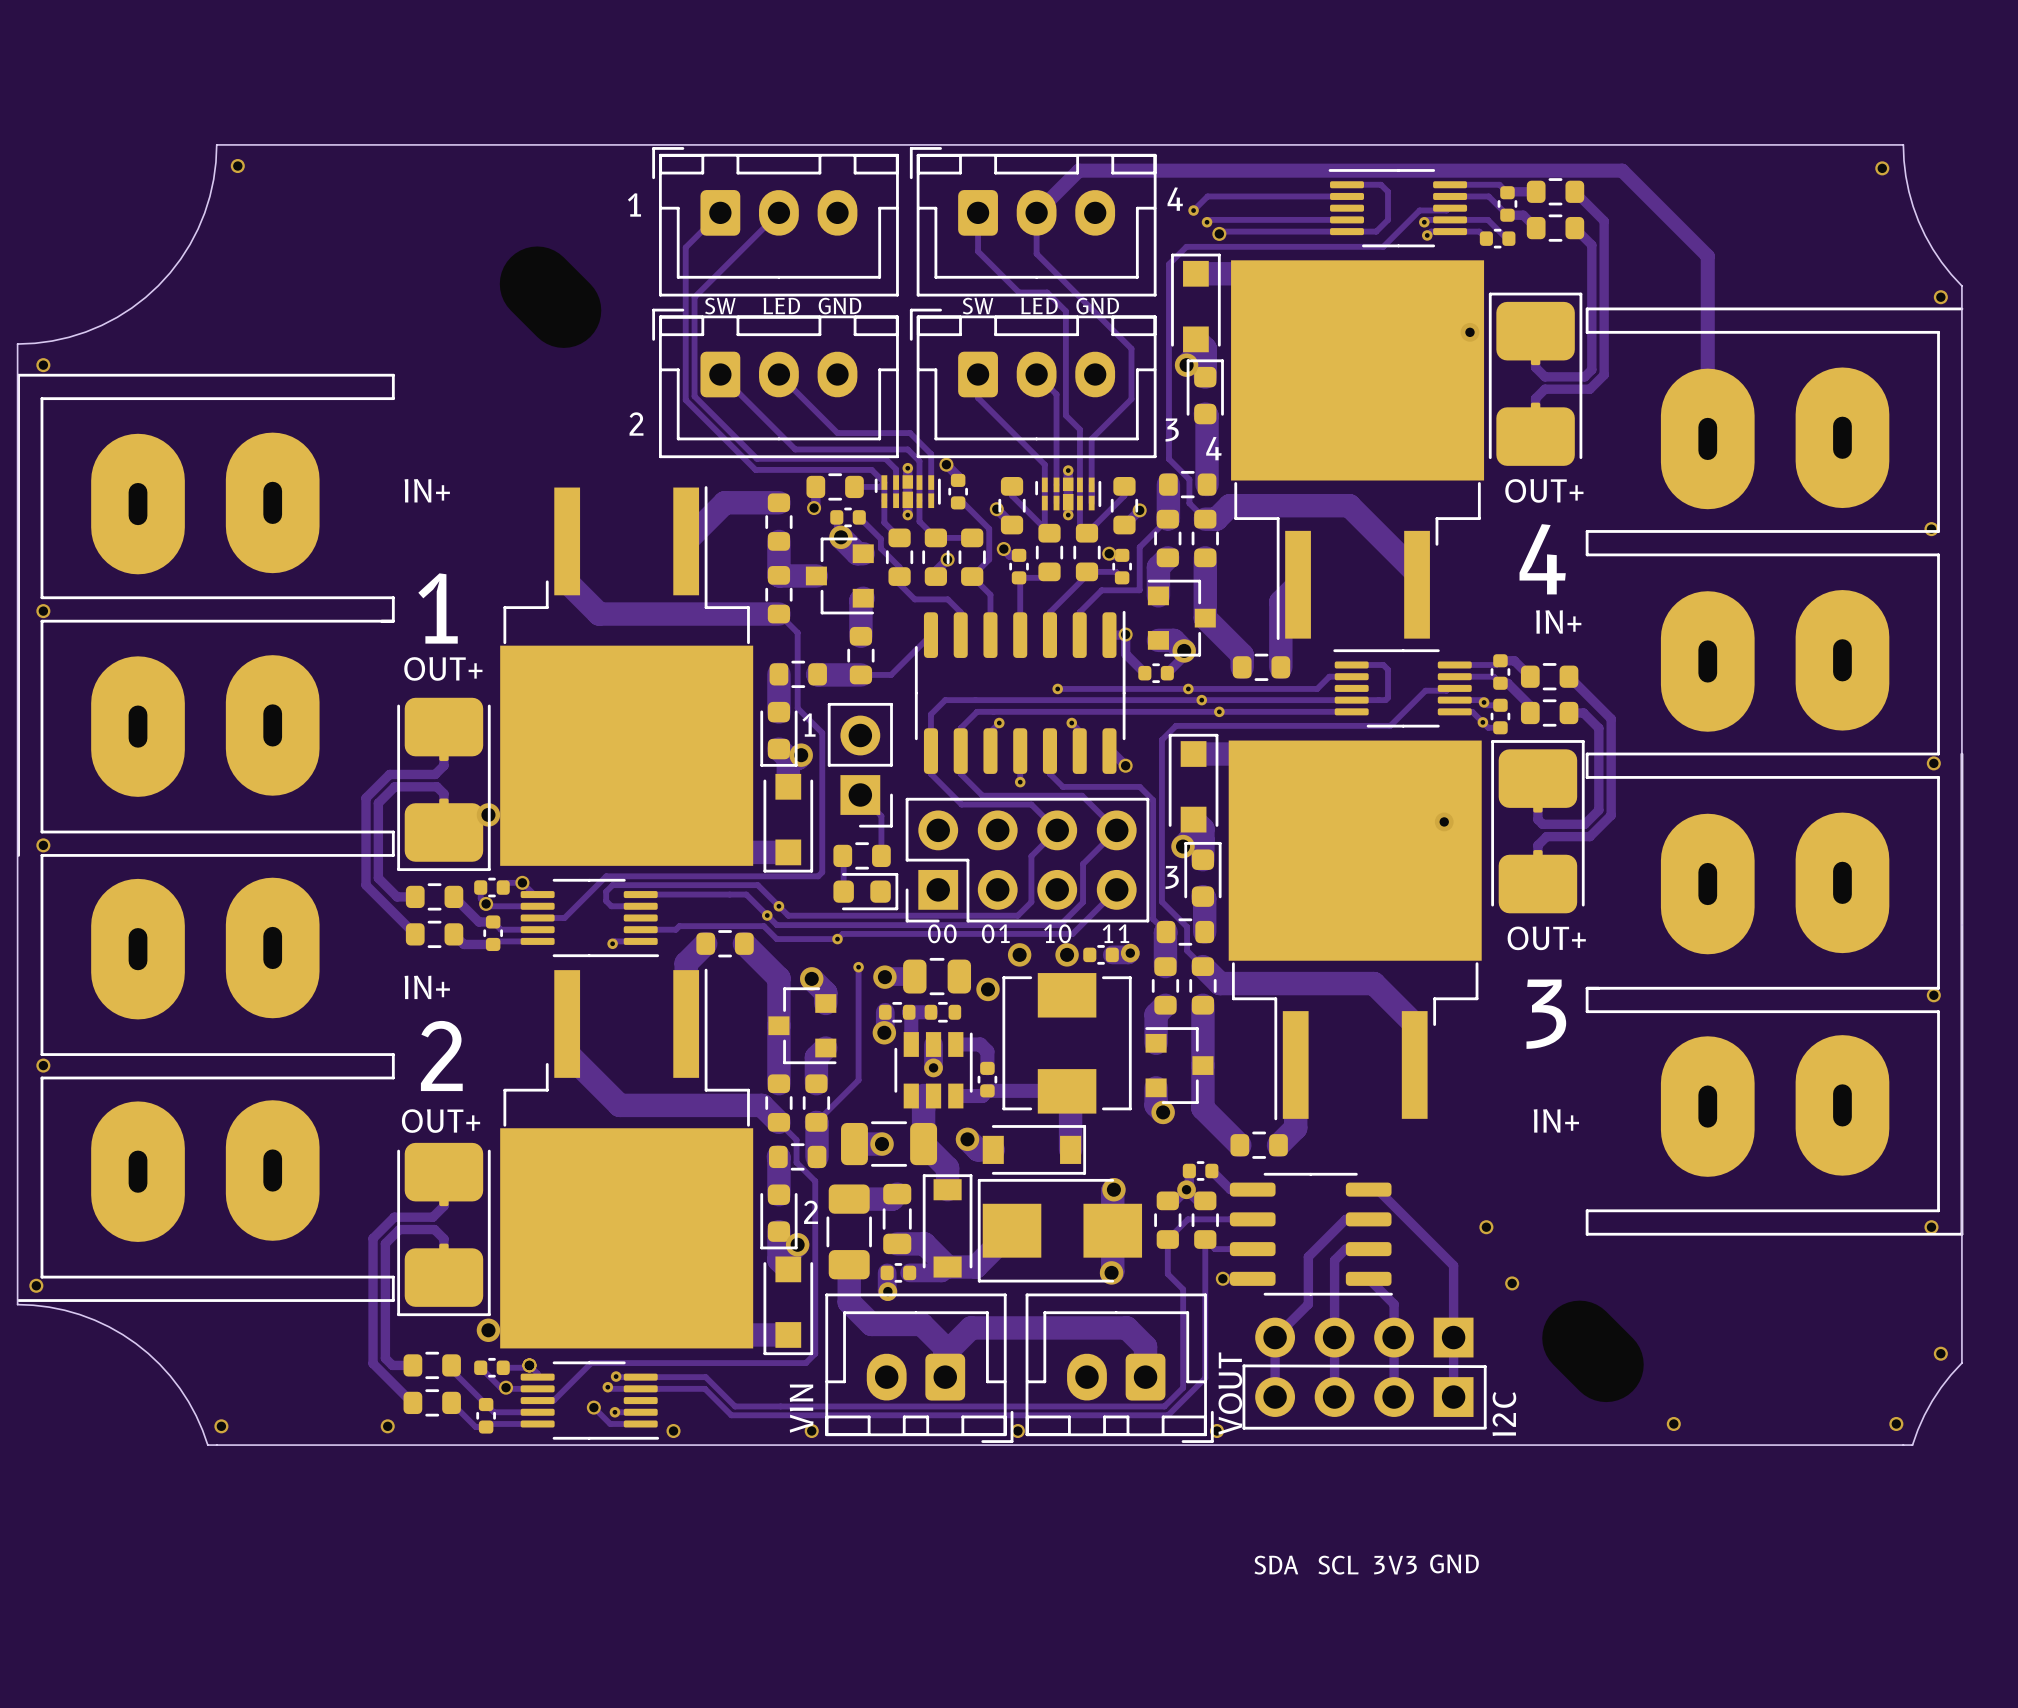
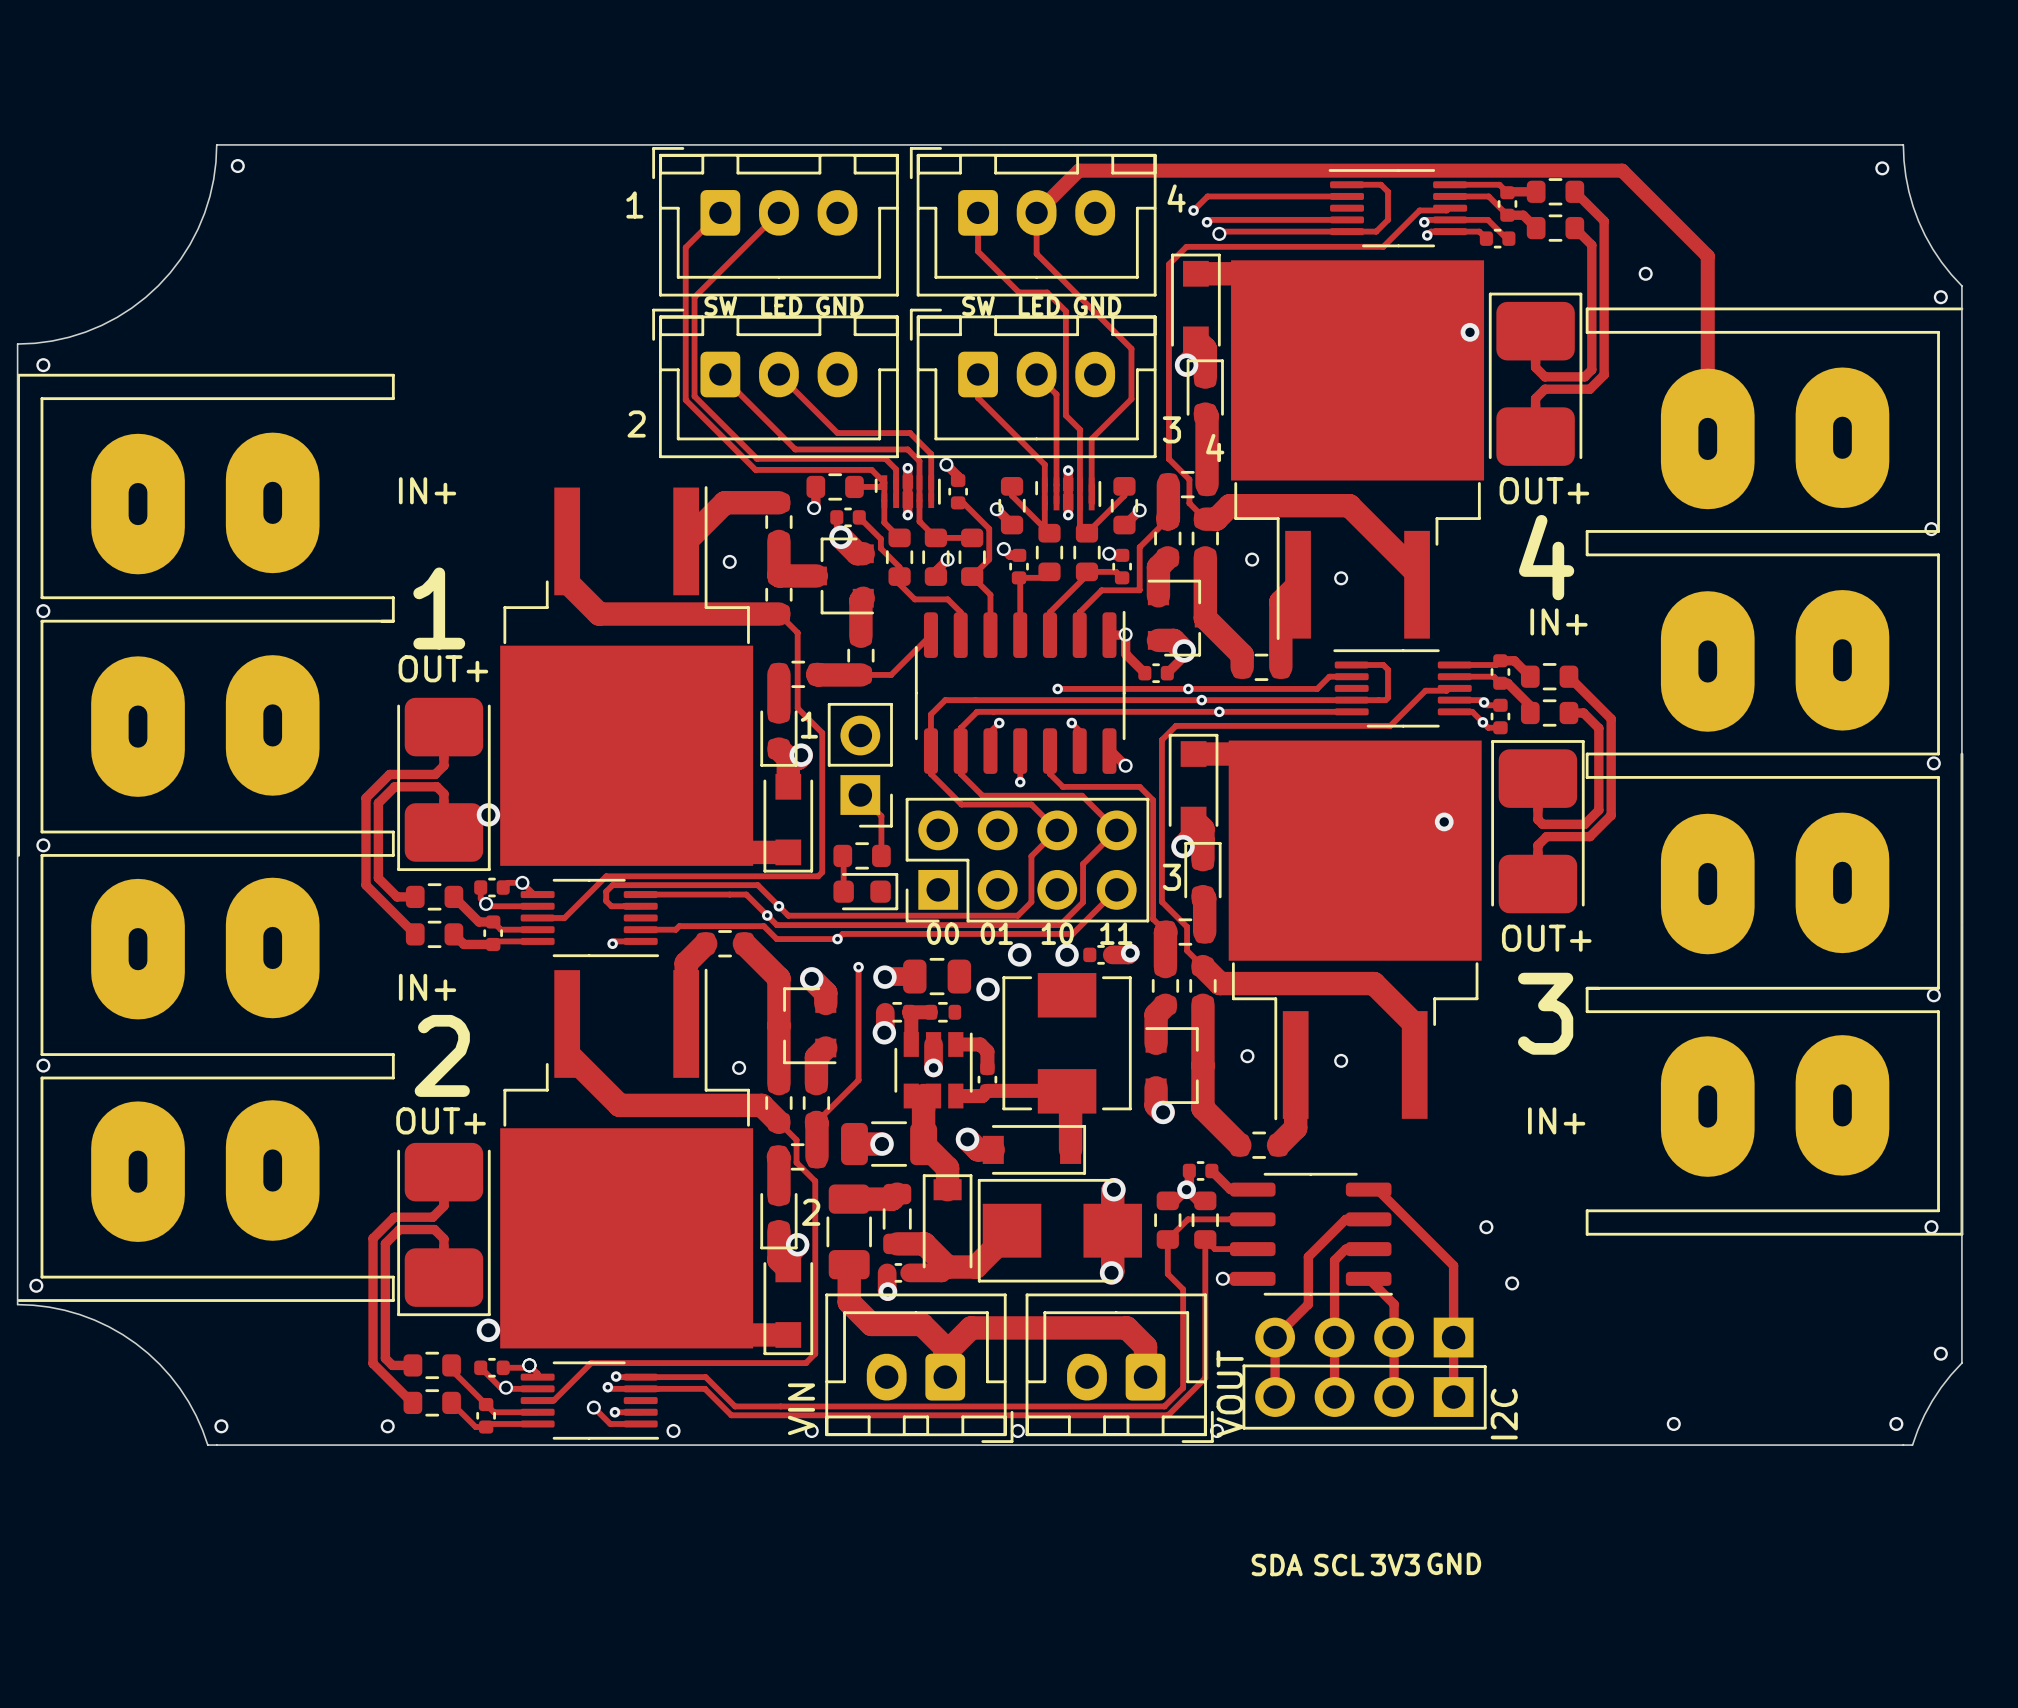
via: none -> (1645, 273)
via: none -> (1252, 559)
via: none -> (729, 561)
via: none -> (1341, 578)
via: none -> (1247, 1056)
via: none -> (1341, 1060)
via: none -> (739, 1067)

